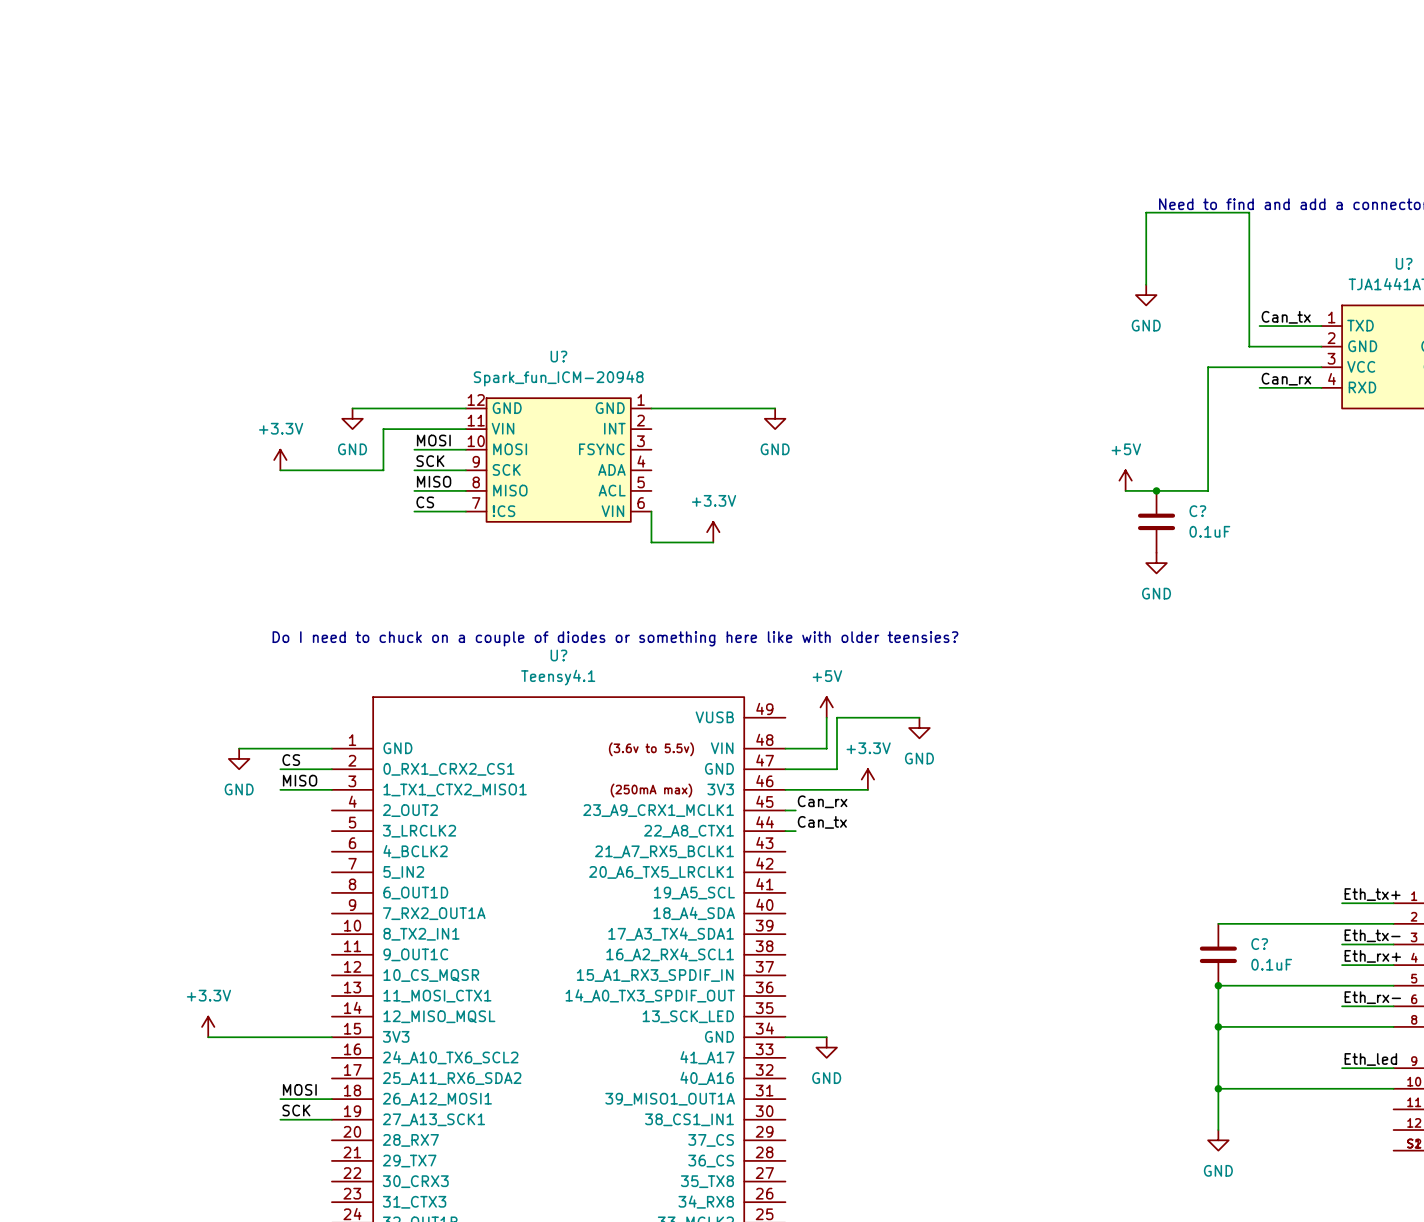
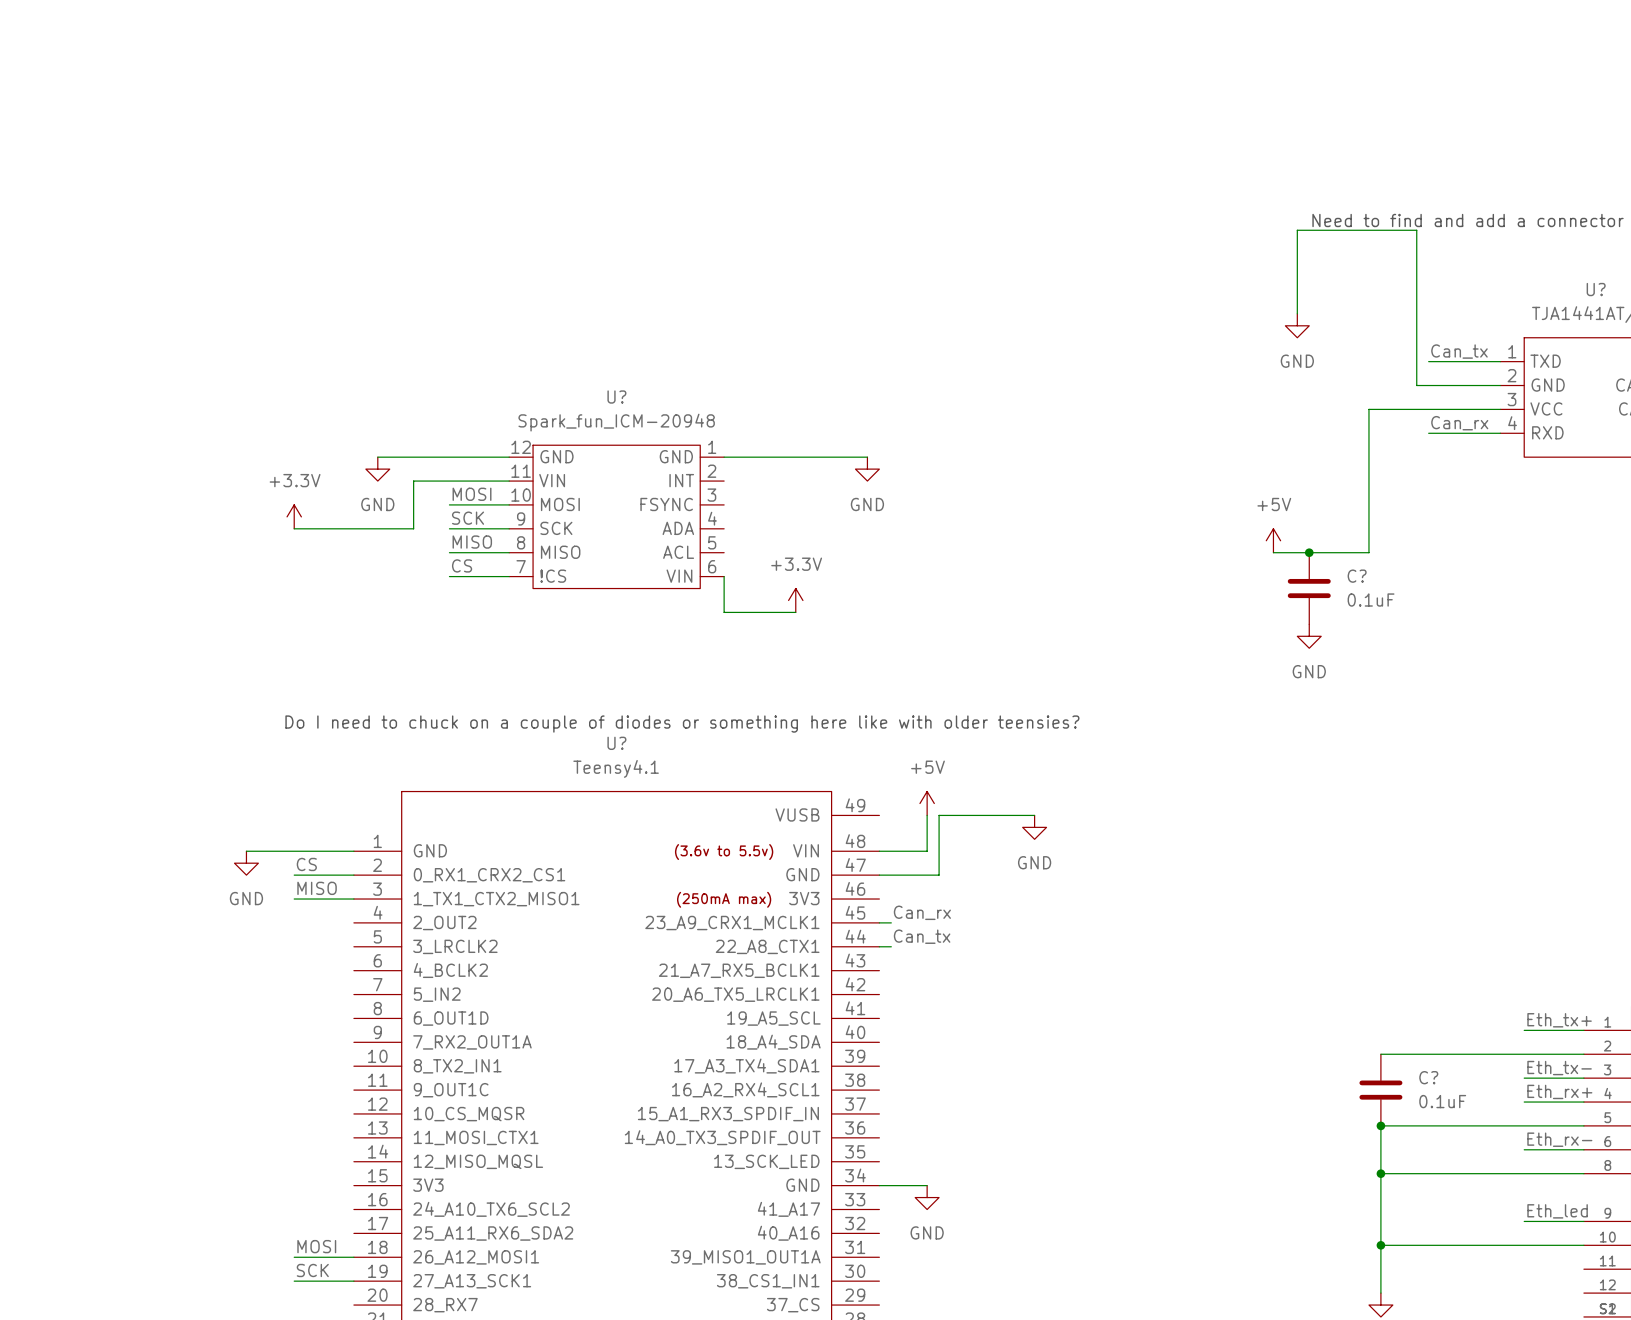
power symbol: +3.3V (867, 779) -> none
wire: (785, 789) (867, 789) -> none
power symbol: +3.3V (208, 1026) -> none
wire: (208, 1037) (331, 1037) -> none

